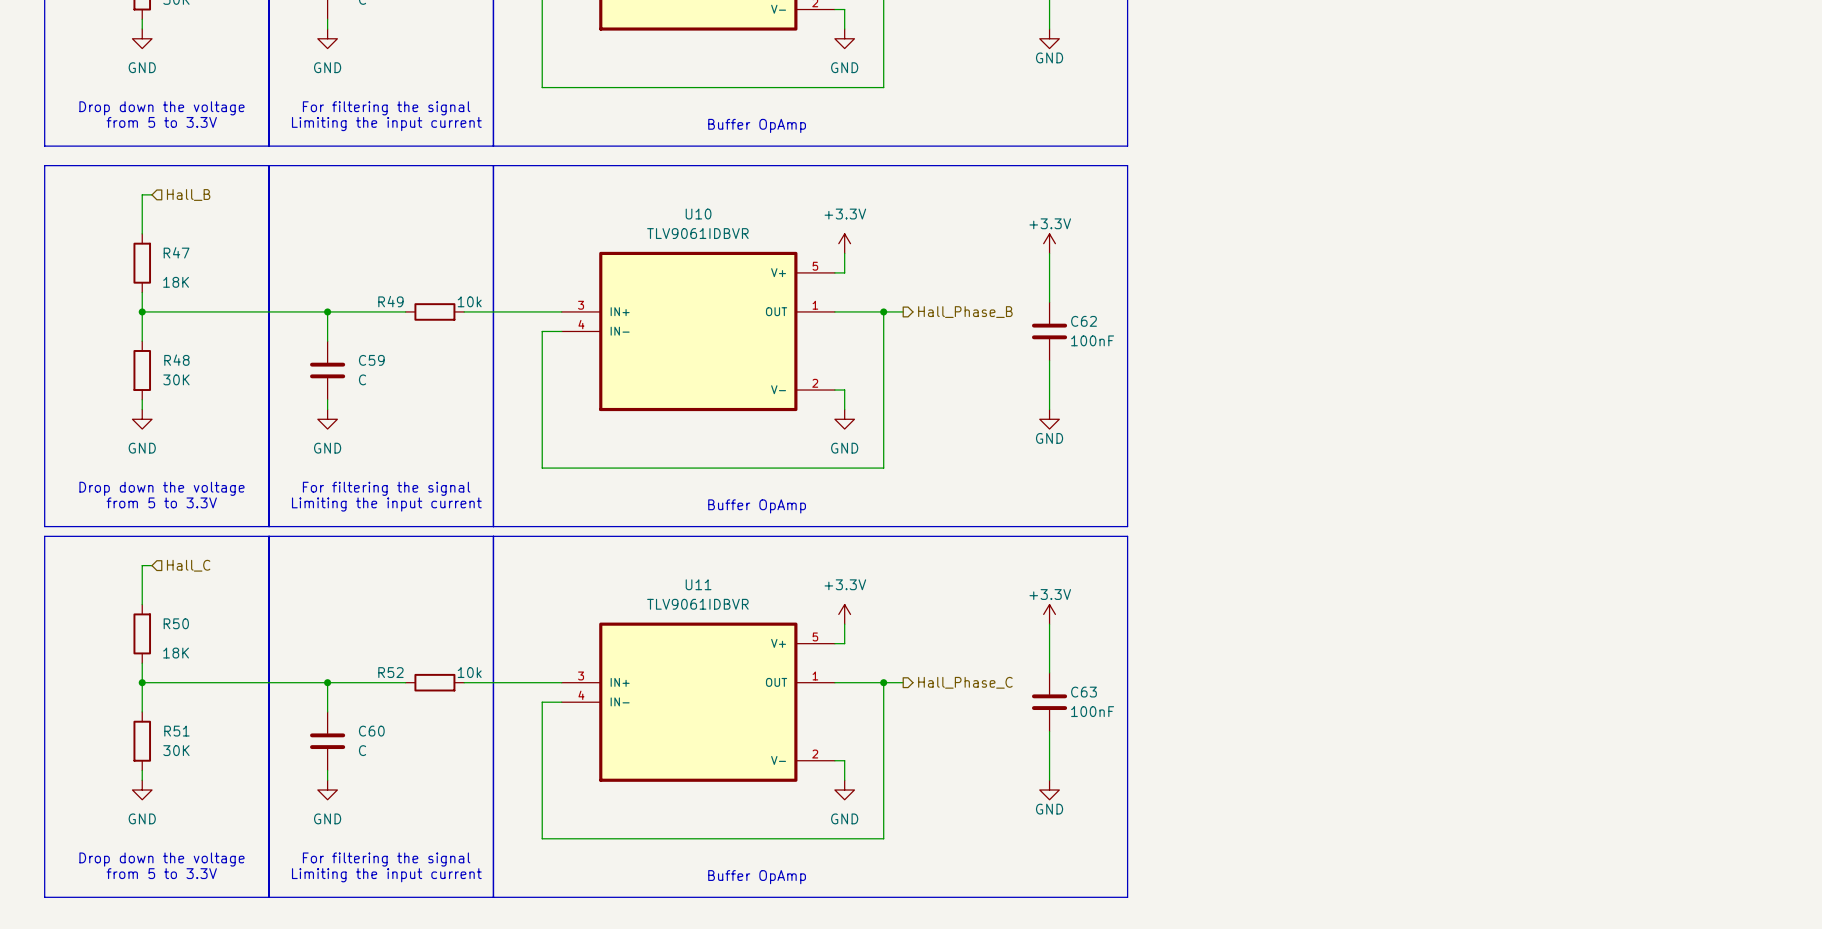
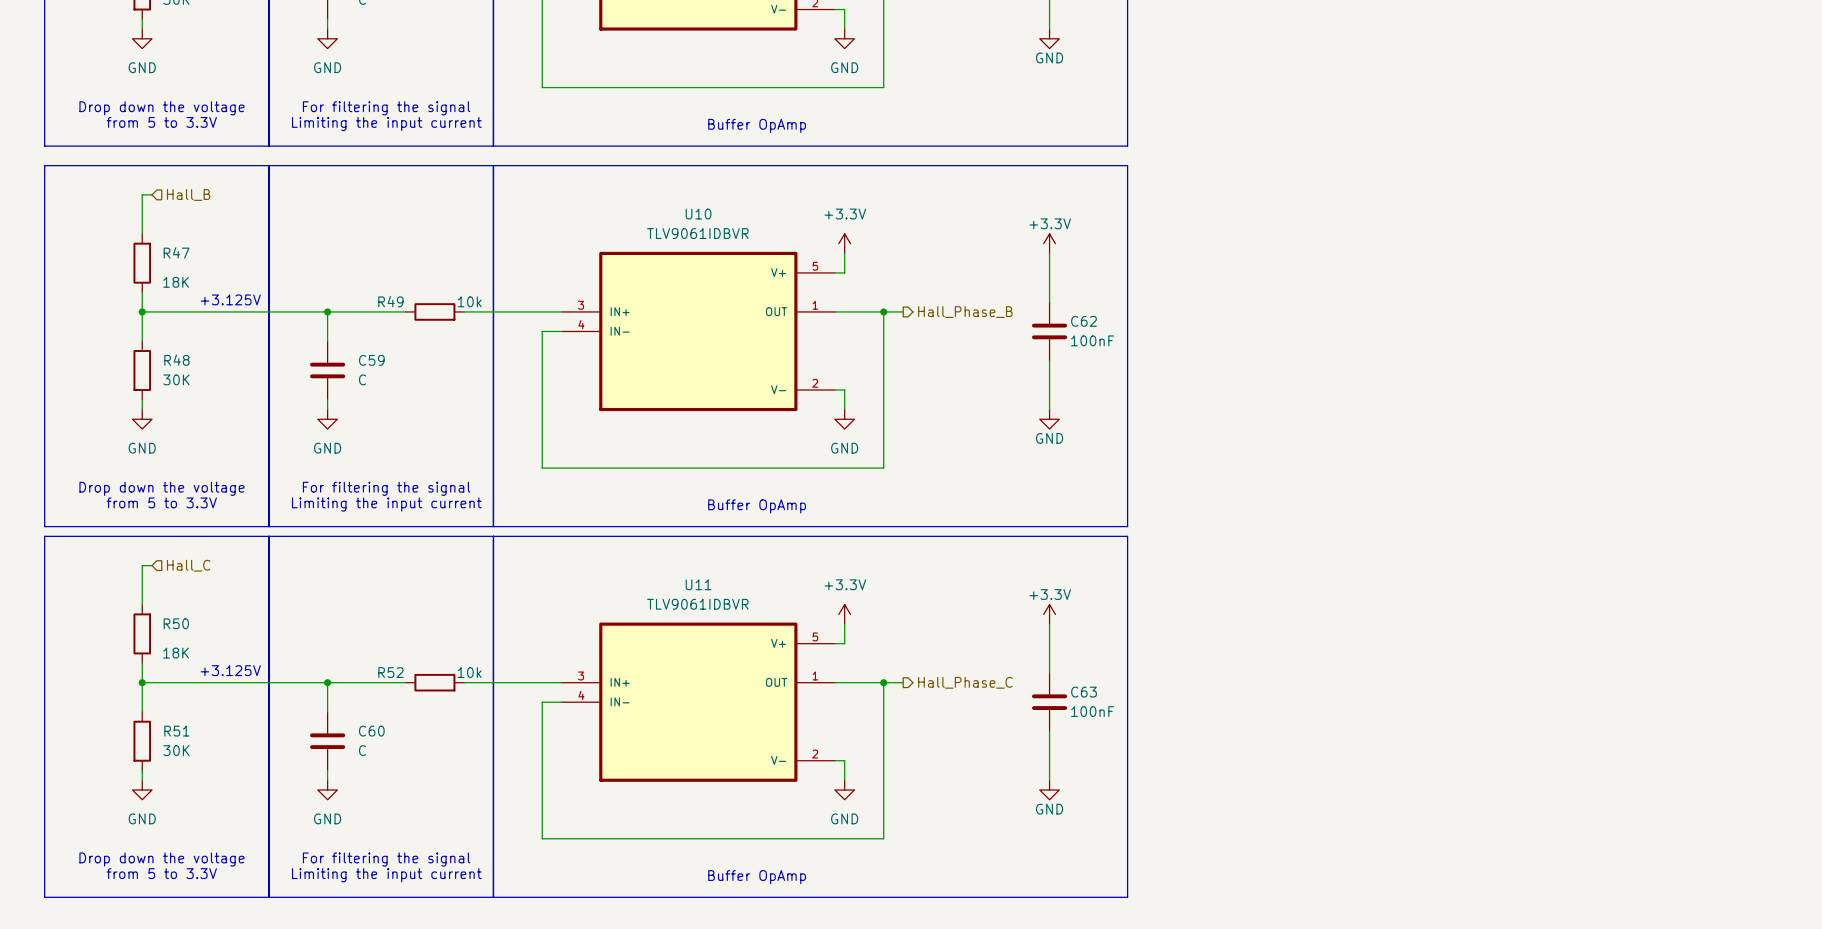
text: none -> +3.125V (230, 299)
text: none -> +3.125V (230, 670)

